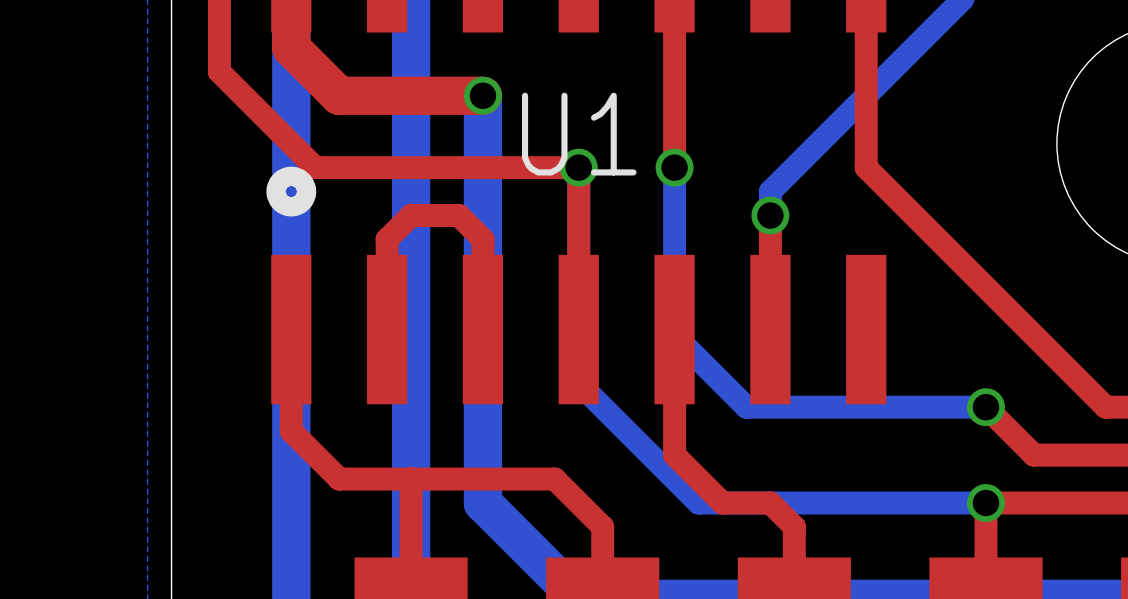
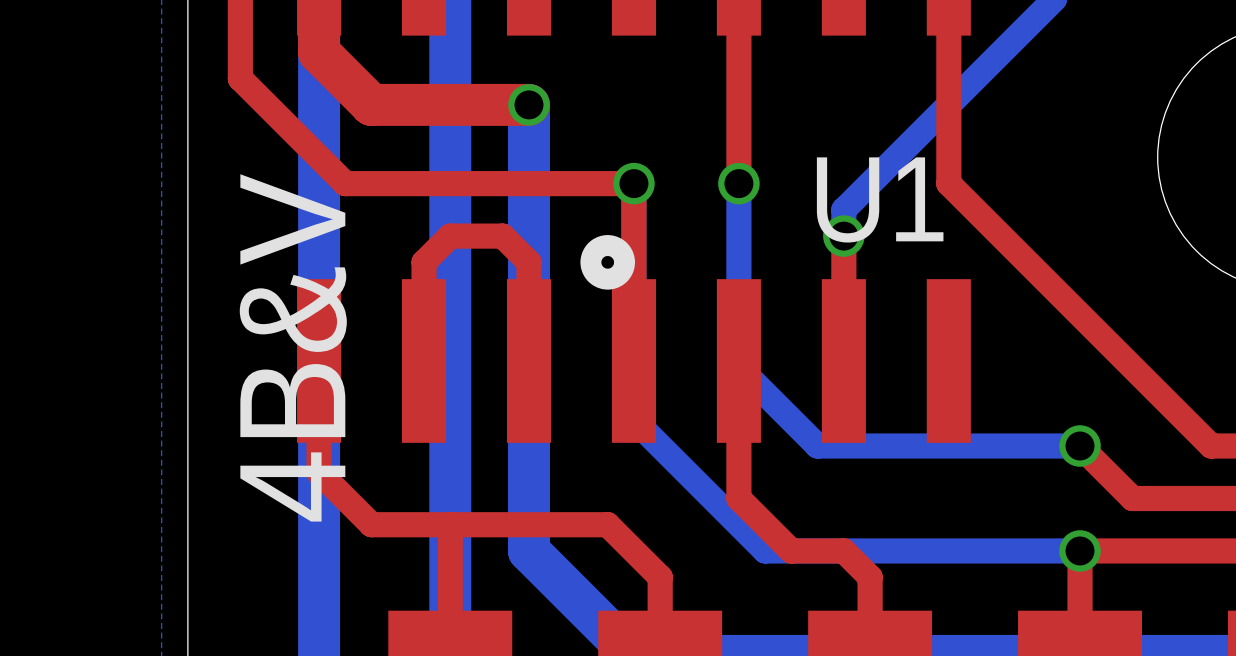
text position: U1 (579, 134) -> U1 (880, 199)
drawing position: (291, 191) -> (607, 262)
text: none -> 4B&V (293, 347)

